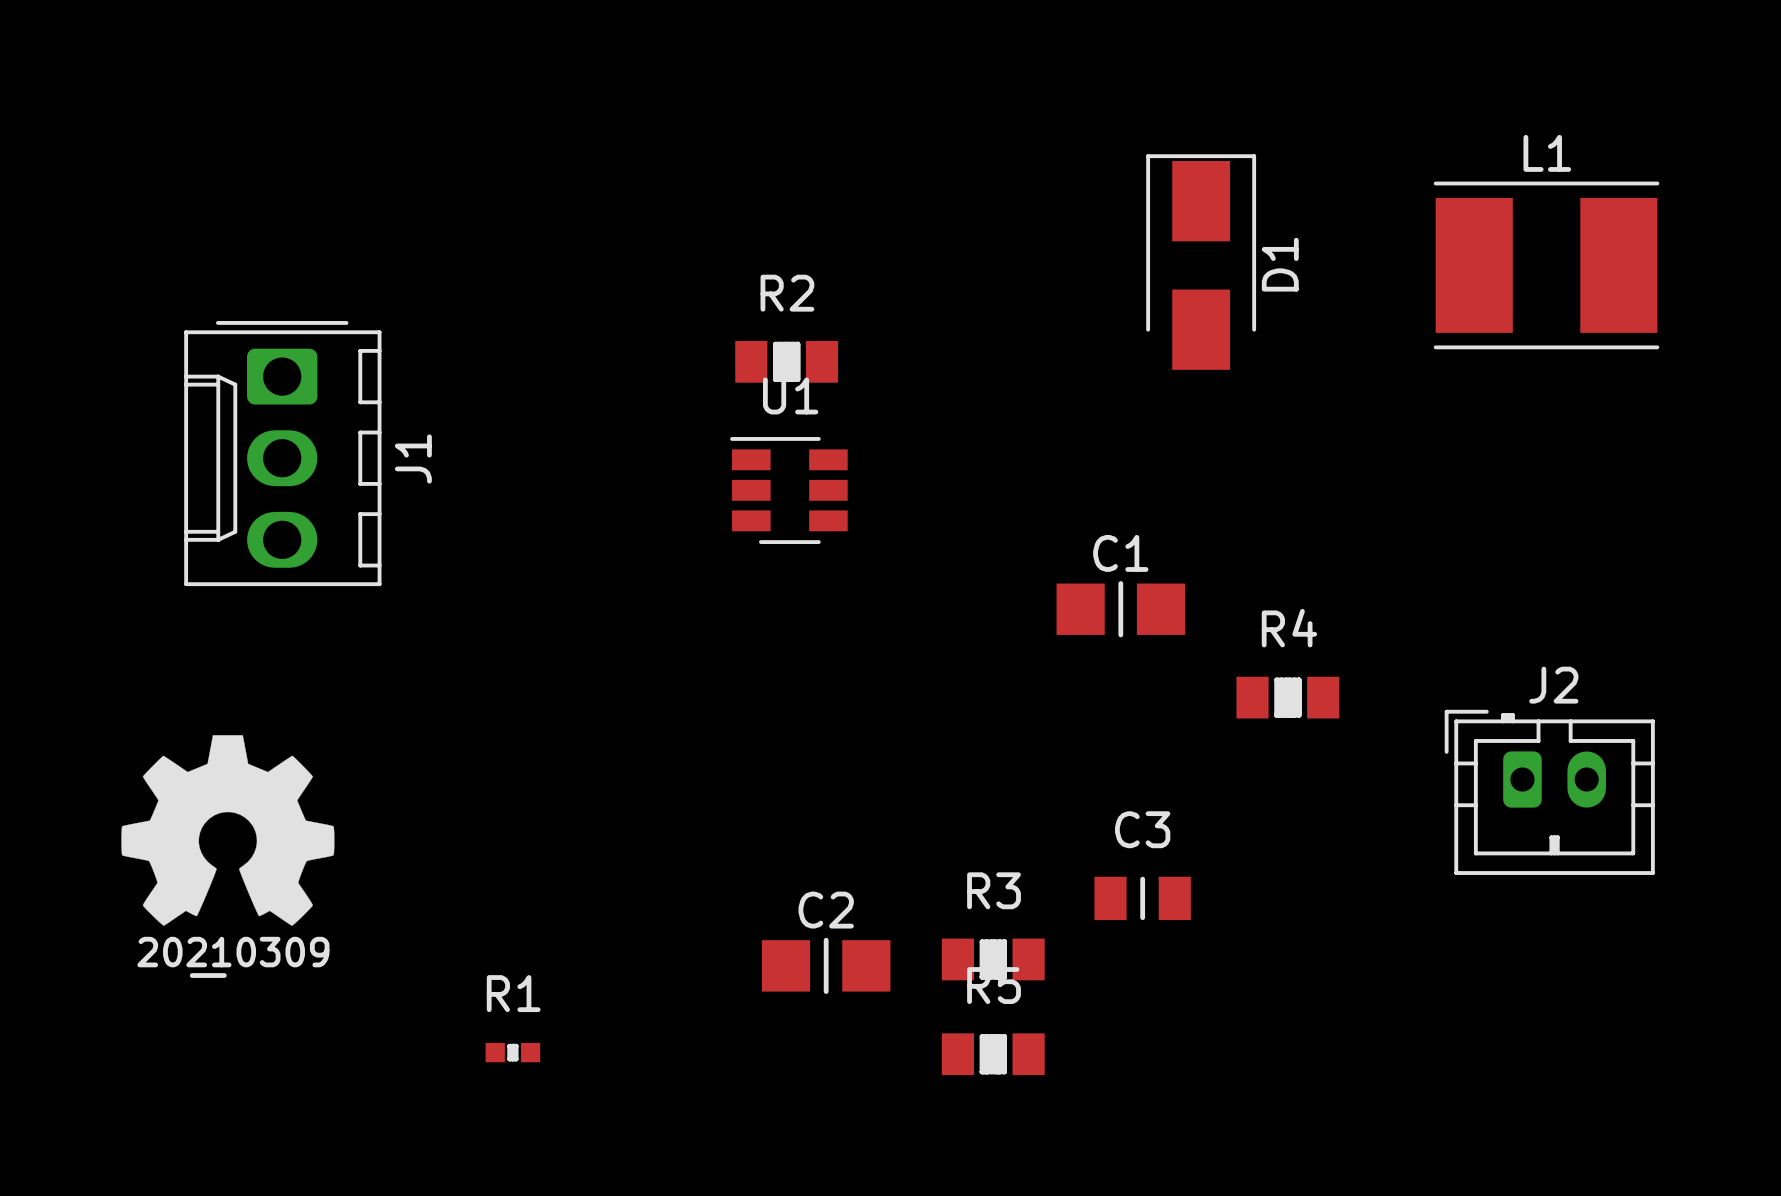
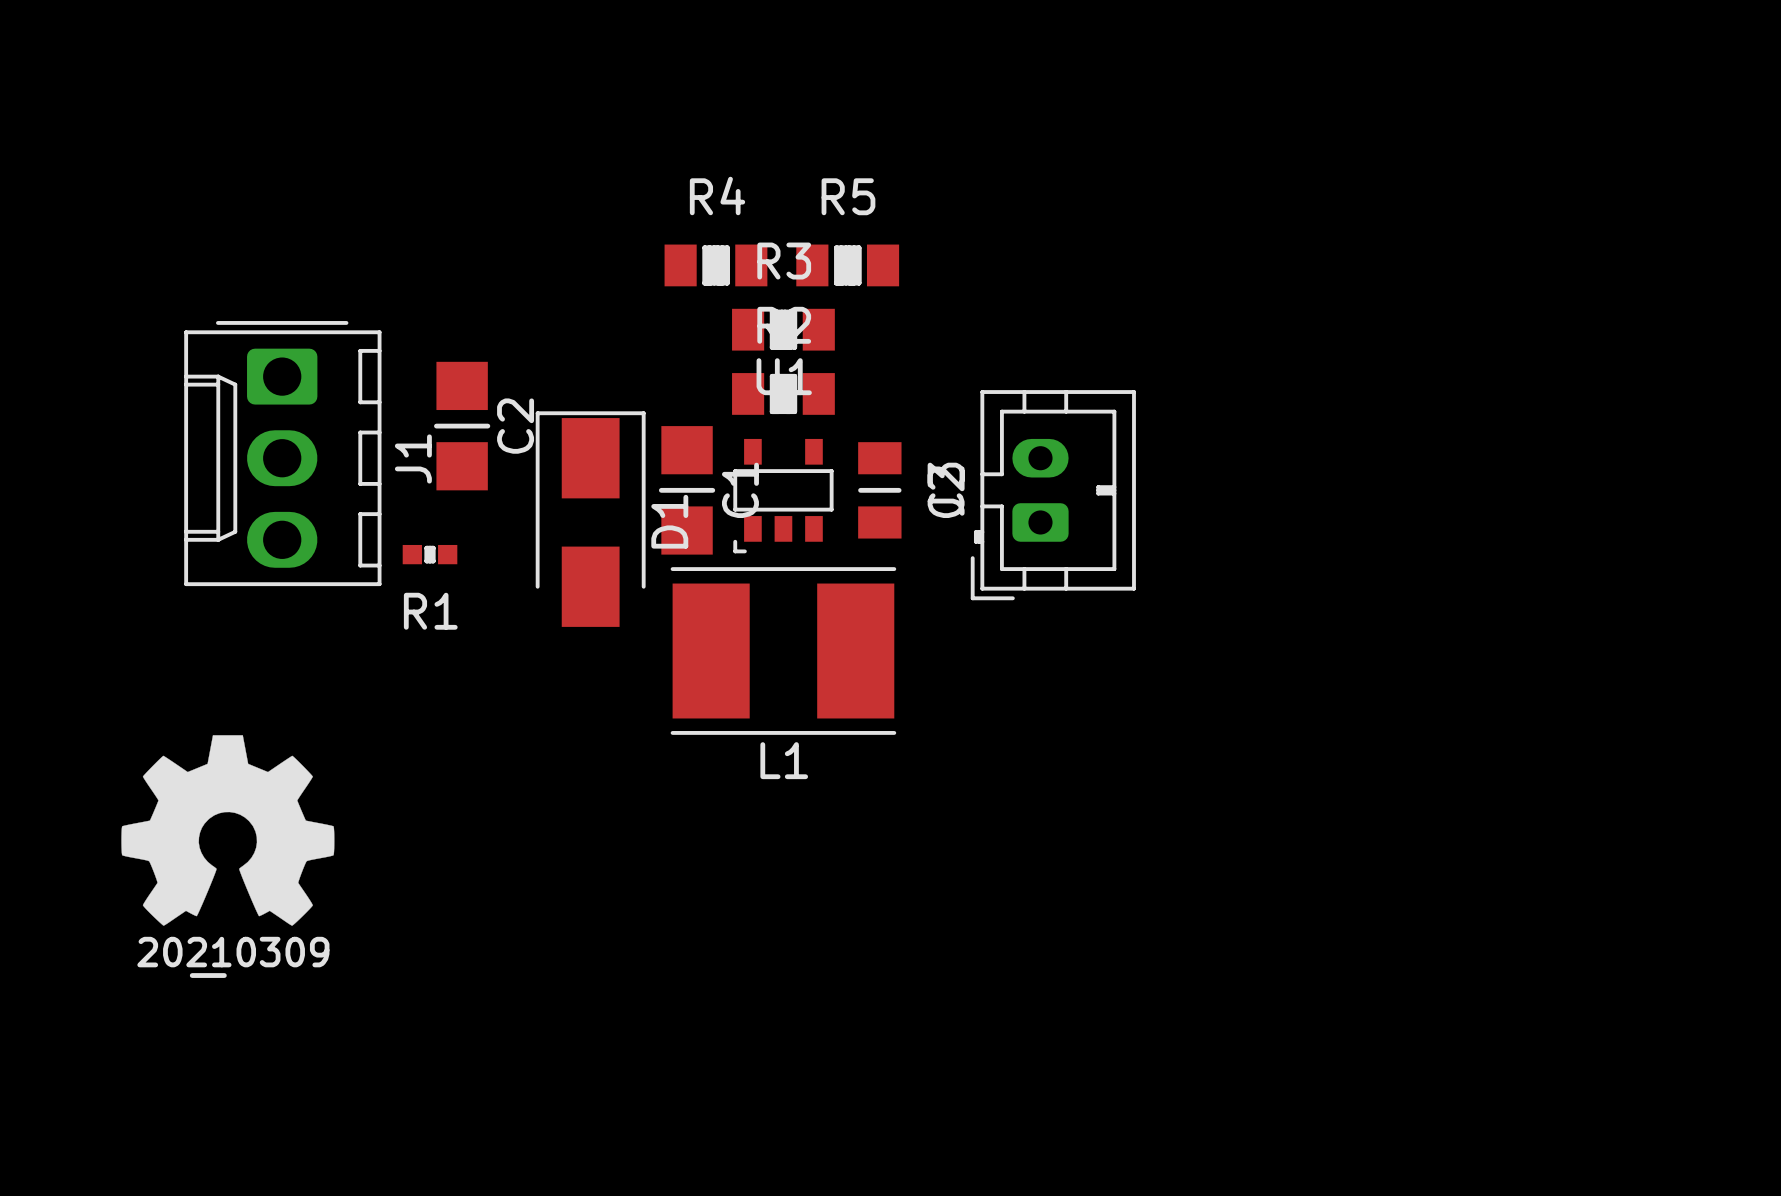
L1 name position: L1 (1547, 153) -> L1 (784, 760)
D1 position: (1201, 262) -> (590, 519)
L1 position: (1546, 265) -> (783, 651)
R2 position: (786, 361) -> (783, 393)
U1 footprint: [730, 437, 848, 545] -> [733, 438, 834, 554]
C1 rotation: 0° (1120, 609) -> 90° clockwise (687, 490)
C1 position: (1120, 609) -> (687, 490)
R4 position: (1287, 697) -> (715, 265)
J2 rotation: 0° (1549, 792) -> 90° counterclockwise (1053, 495)
J2 position: (1549, 792) -> (1053, 495)
C3 rotation: 0° (1142, 898) -> 90° clockwise (879, 490)
C3 position: (1142, 898) -> (879, 490)
R3 position: (993, 959) -> (783, 329)
C2 rotation: 0° (826, 965) -> 90° clockwise (462, 426)
C2 position: (826, 965) -> (462, 426)
R1 name position: R1 (513, 993) -> R1 (430, 611)
R1 position: (512, 1052) -> (430, 554)
R5 position: (993, 1054) -> (847, 265)

